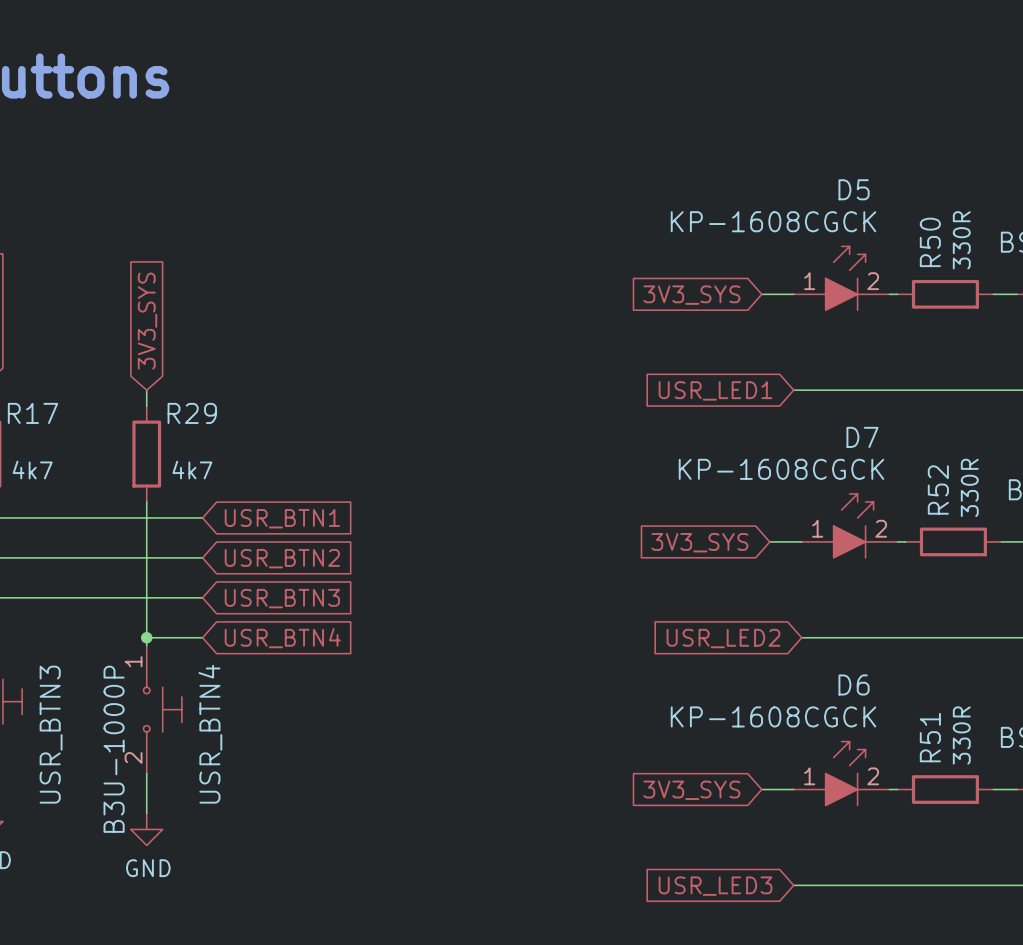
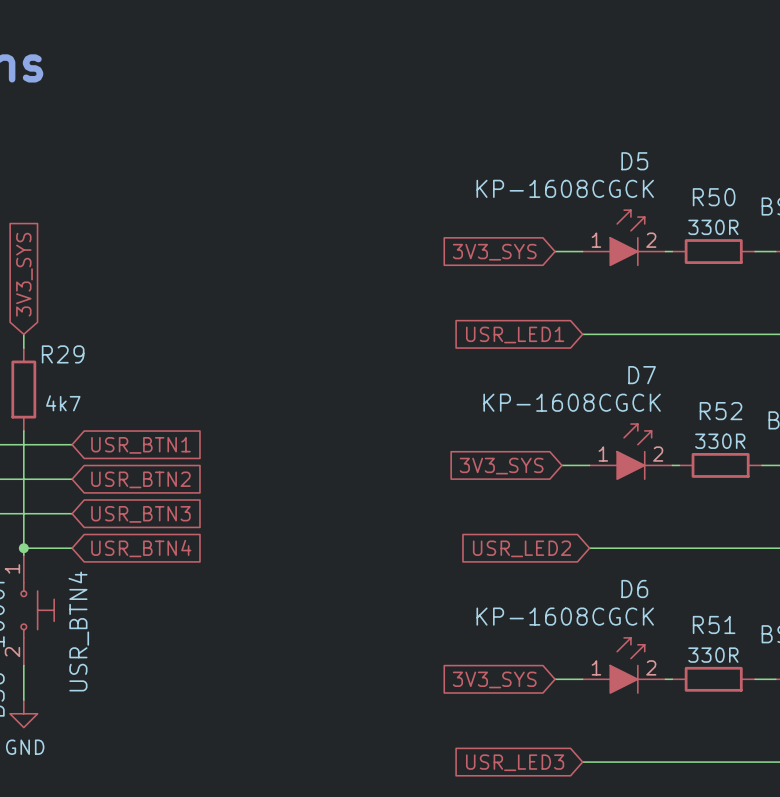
R50 text rotation: 0° (961, 240) -> 90° clockwise (713, 227)
R50 name rotation: 0° (930, 242) -> 90° clockwise (714, 197)
R52 text rotation: 0° (969, 487) -> 90° clockwise (720, 441)
R52 name rotation: 0° (938, 490) -> 90° clockwise (721, 411)
R51 text rotation: 0° (961, 735) -> 90° clockwise (713, 655)
R51 name rotation: 0° (930, 737) -> 90° clockwise (714, 624)

